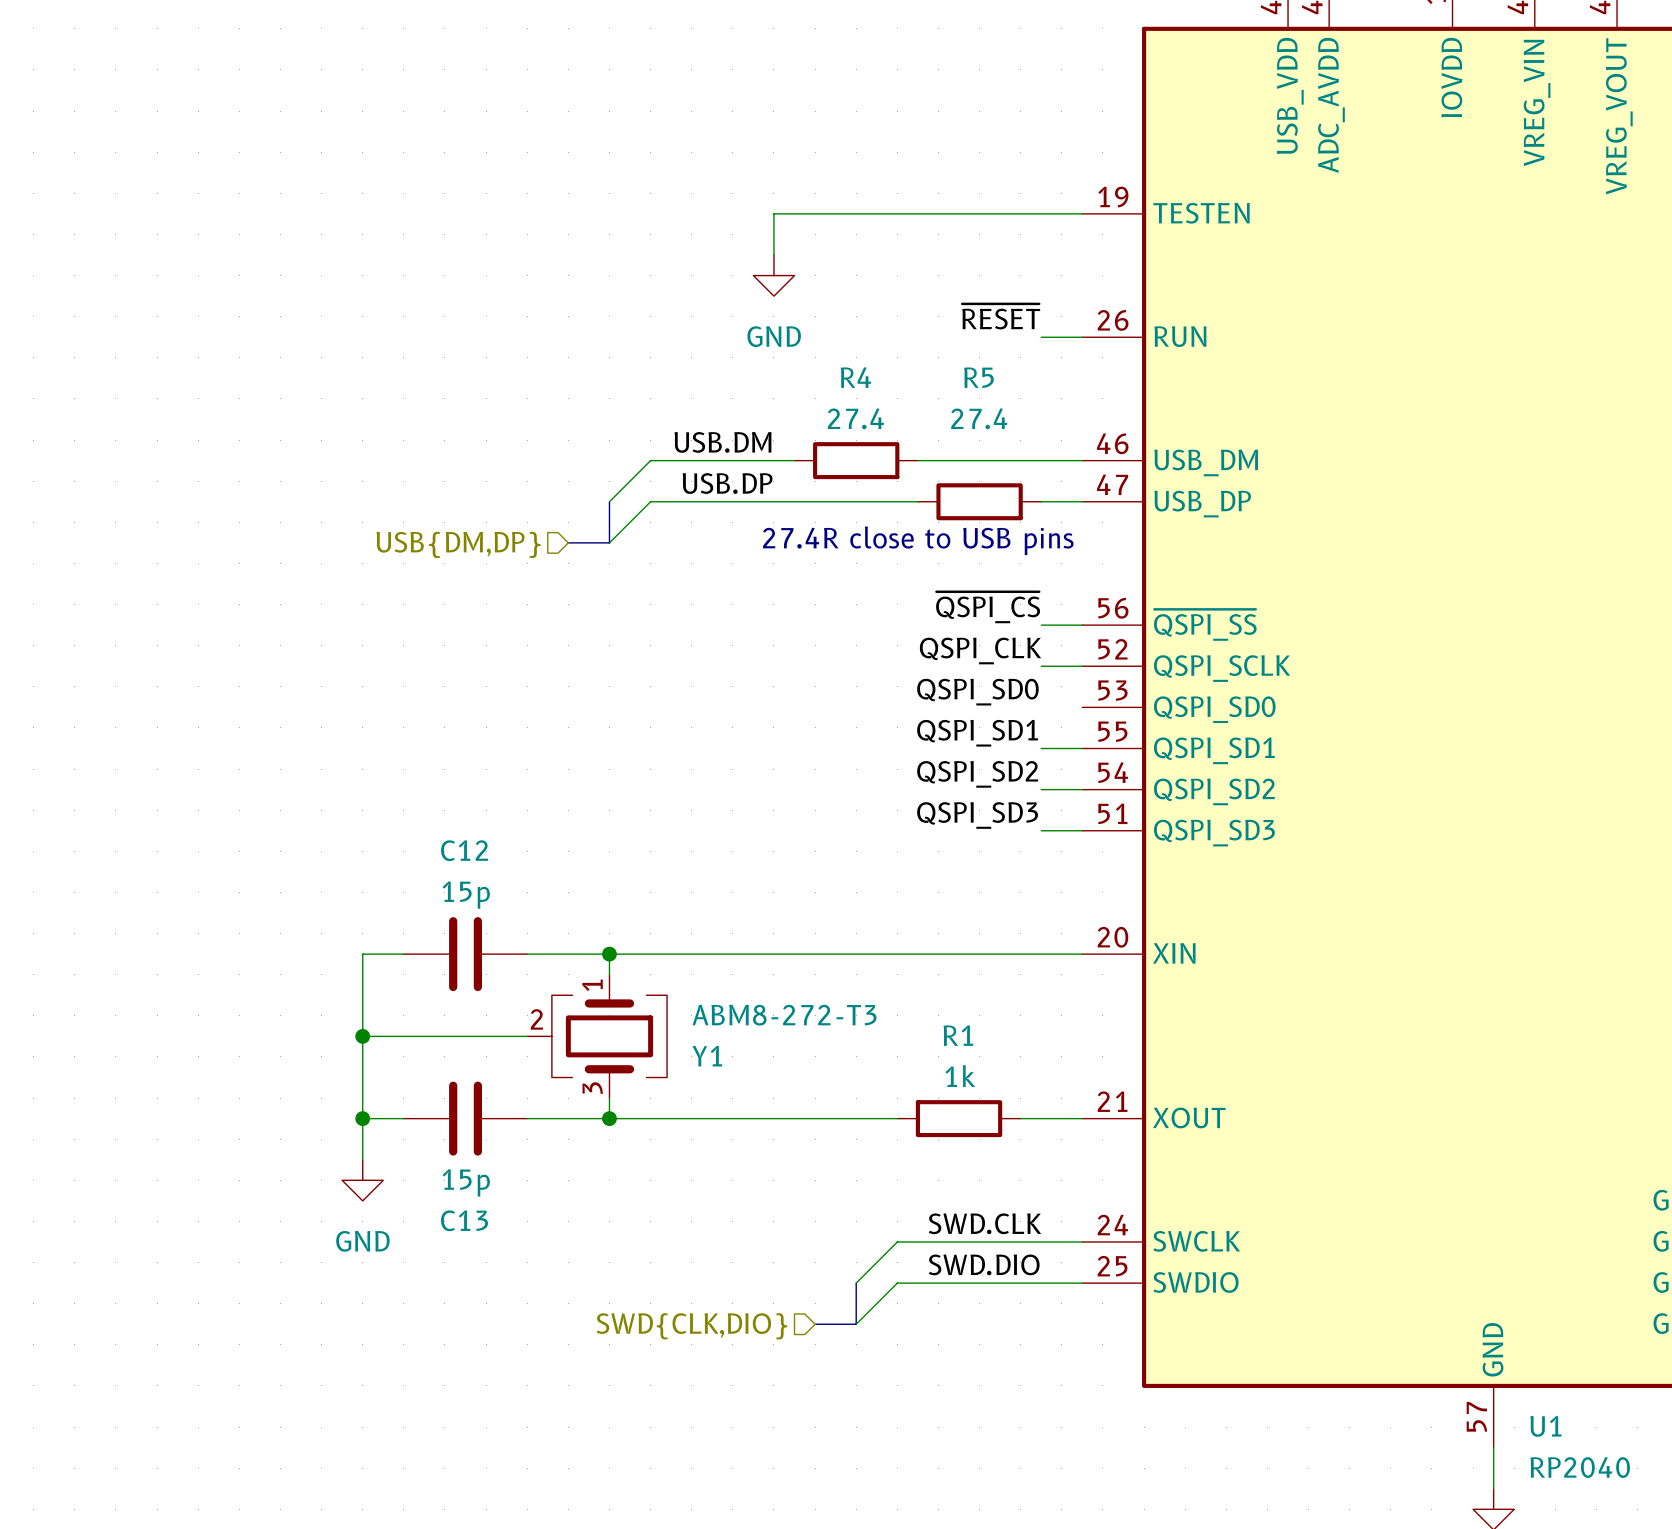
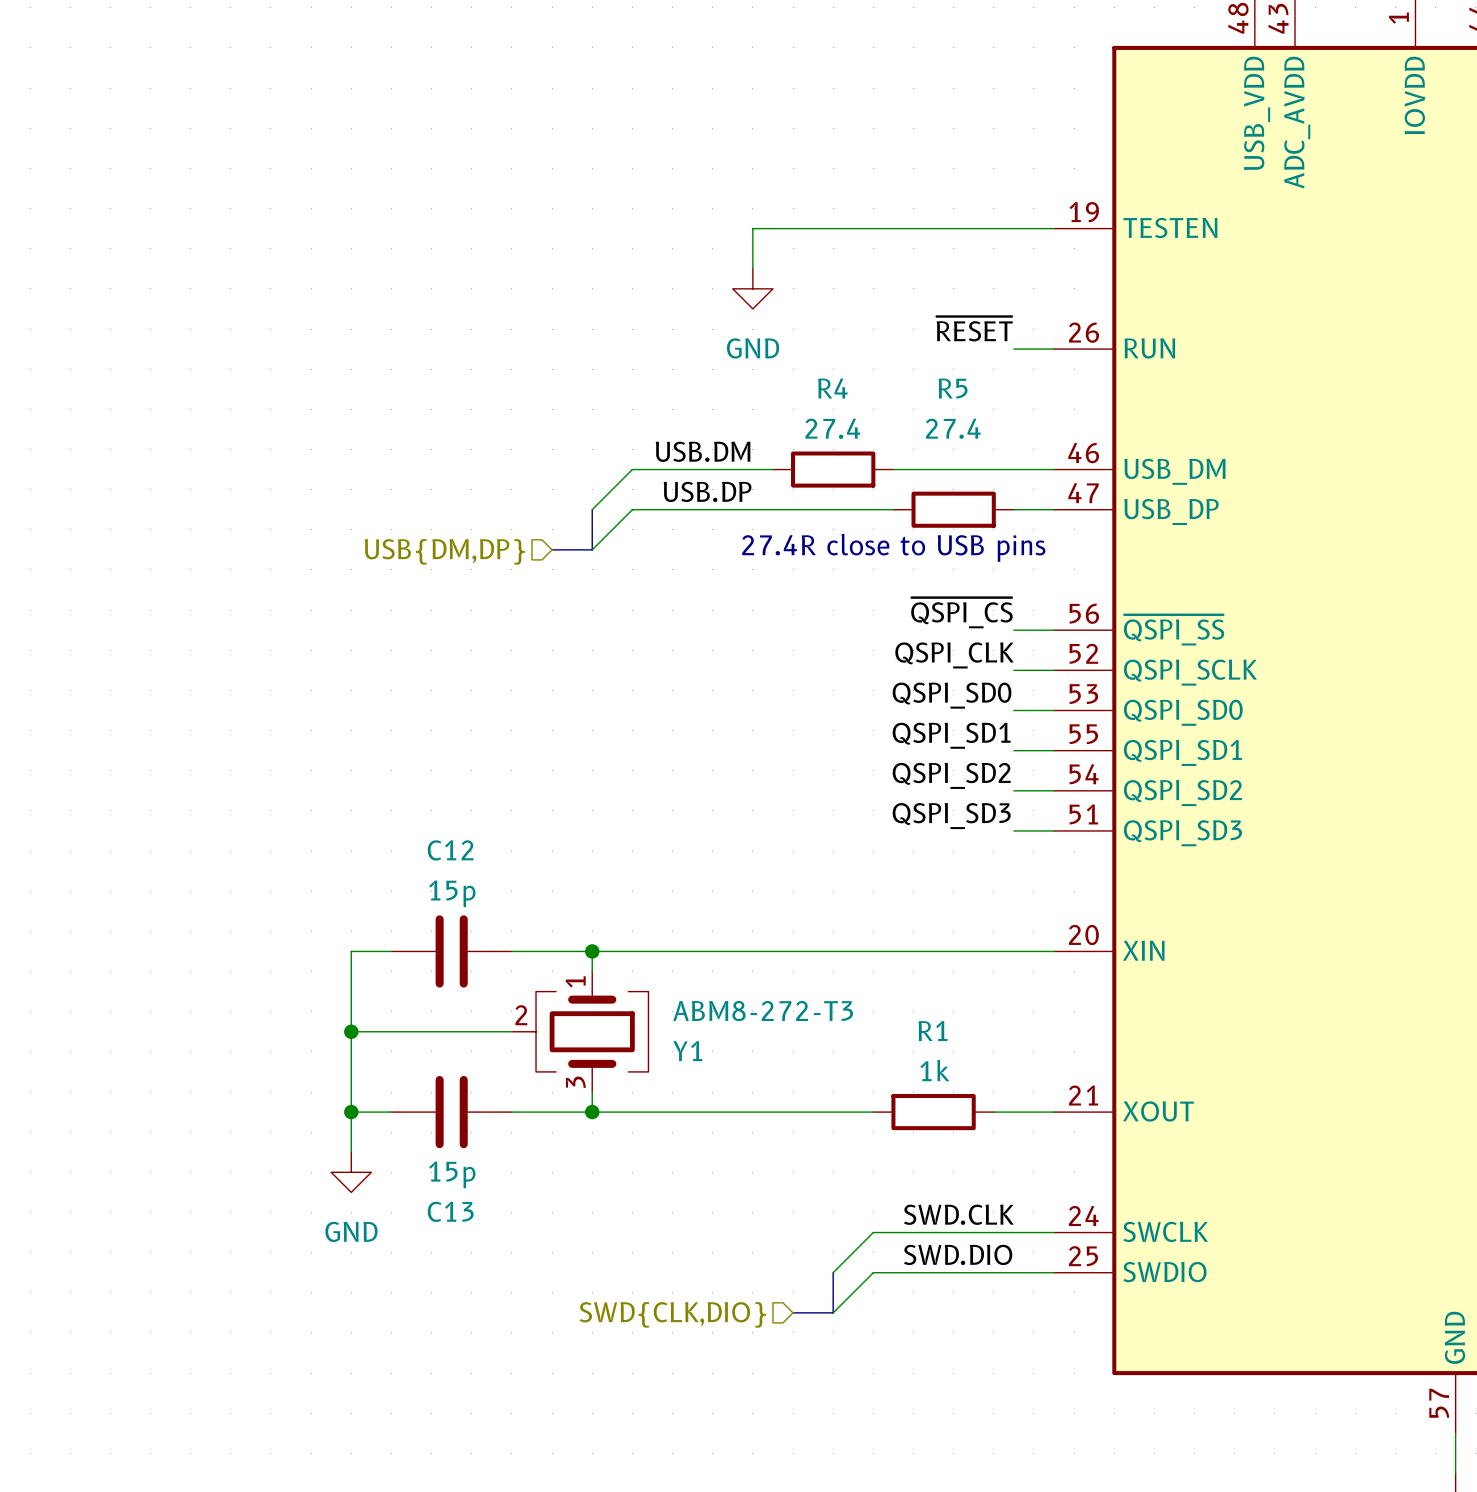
wire: none -> (1013, 710) (1054, 710)

